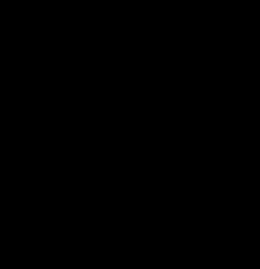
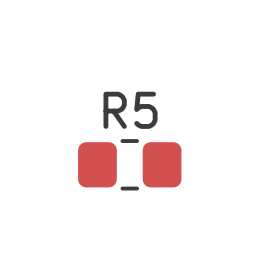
R5: none -> (129, 164)

